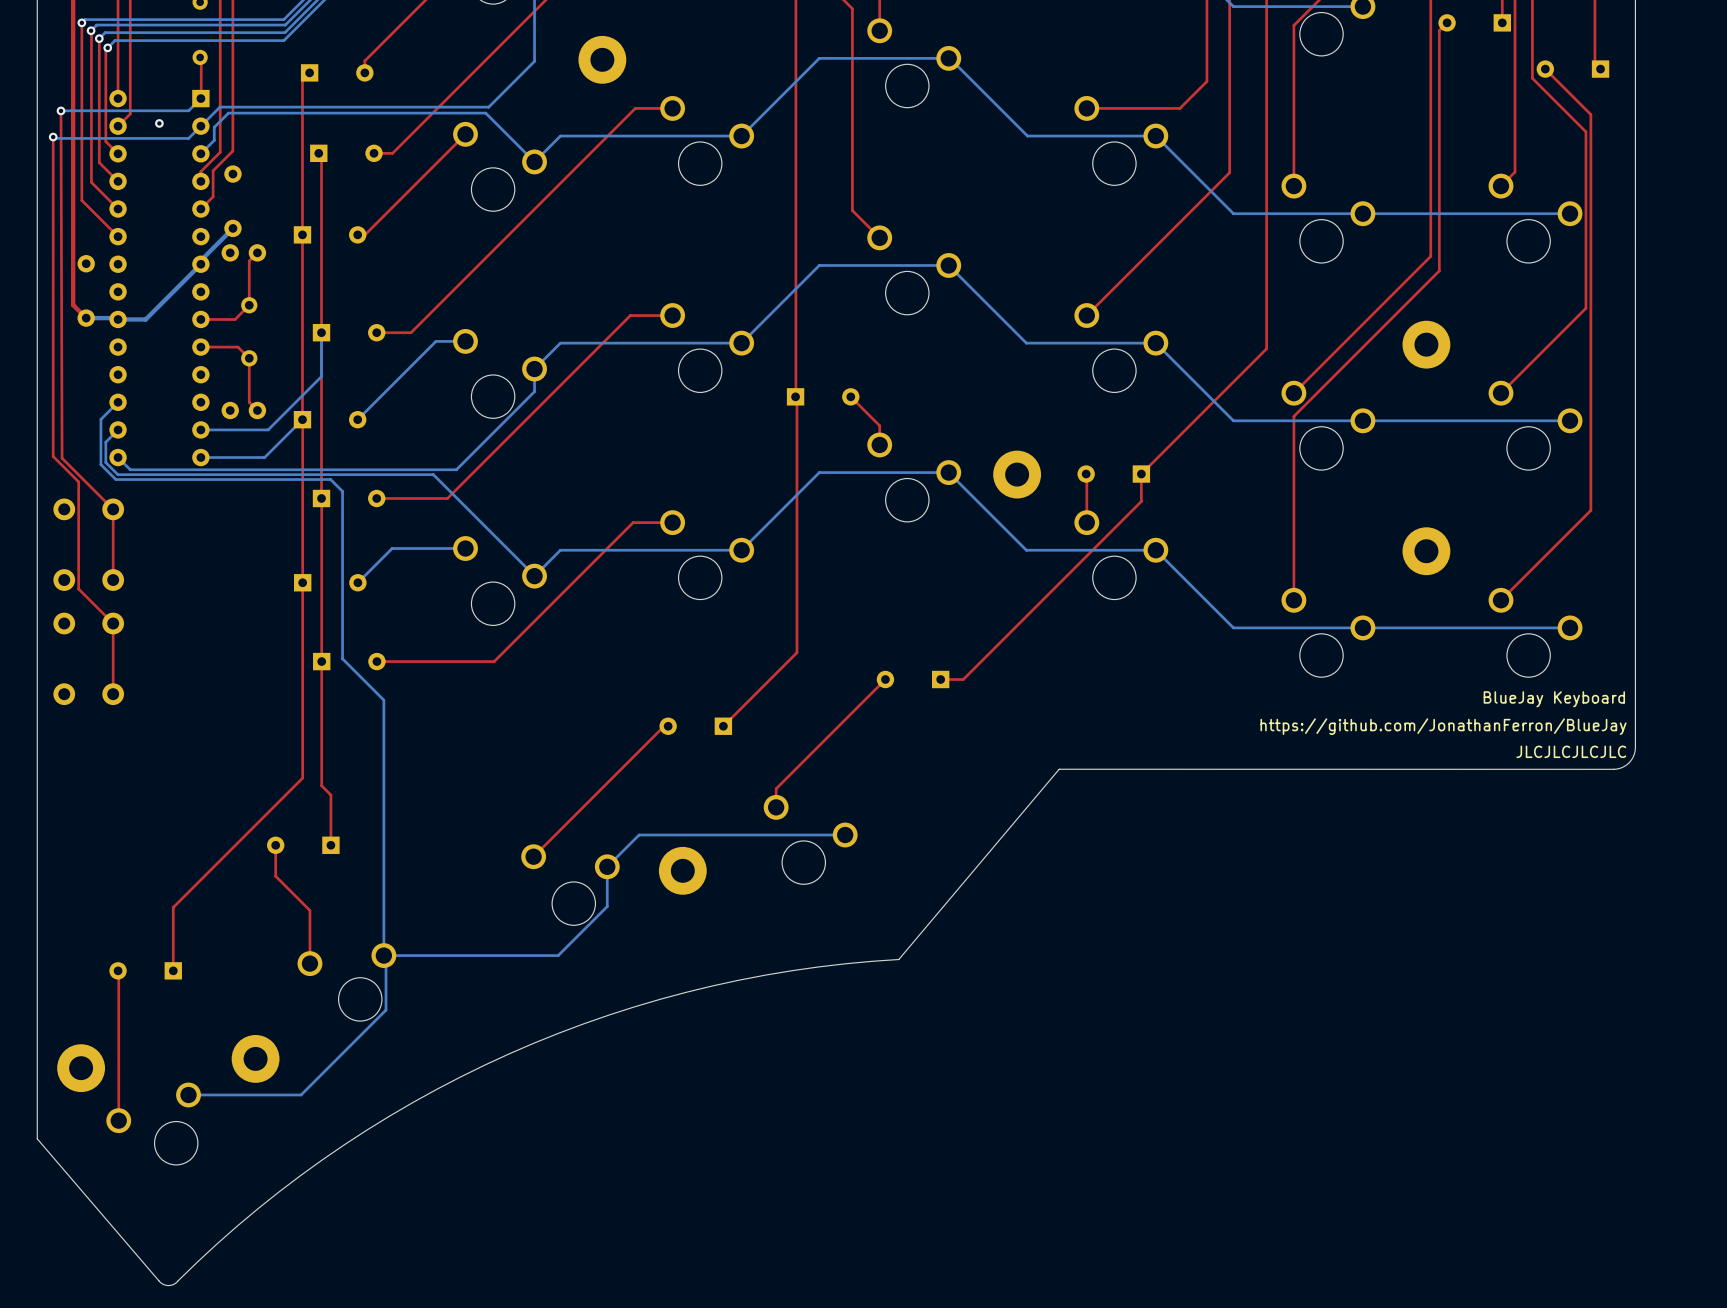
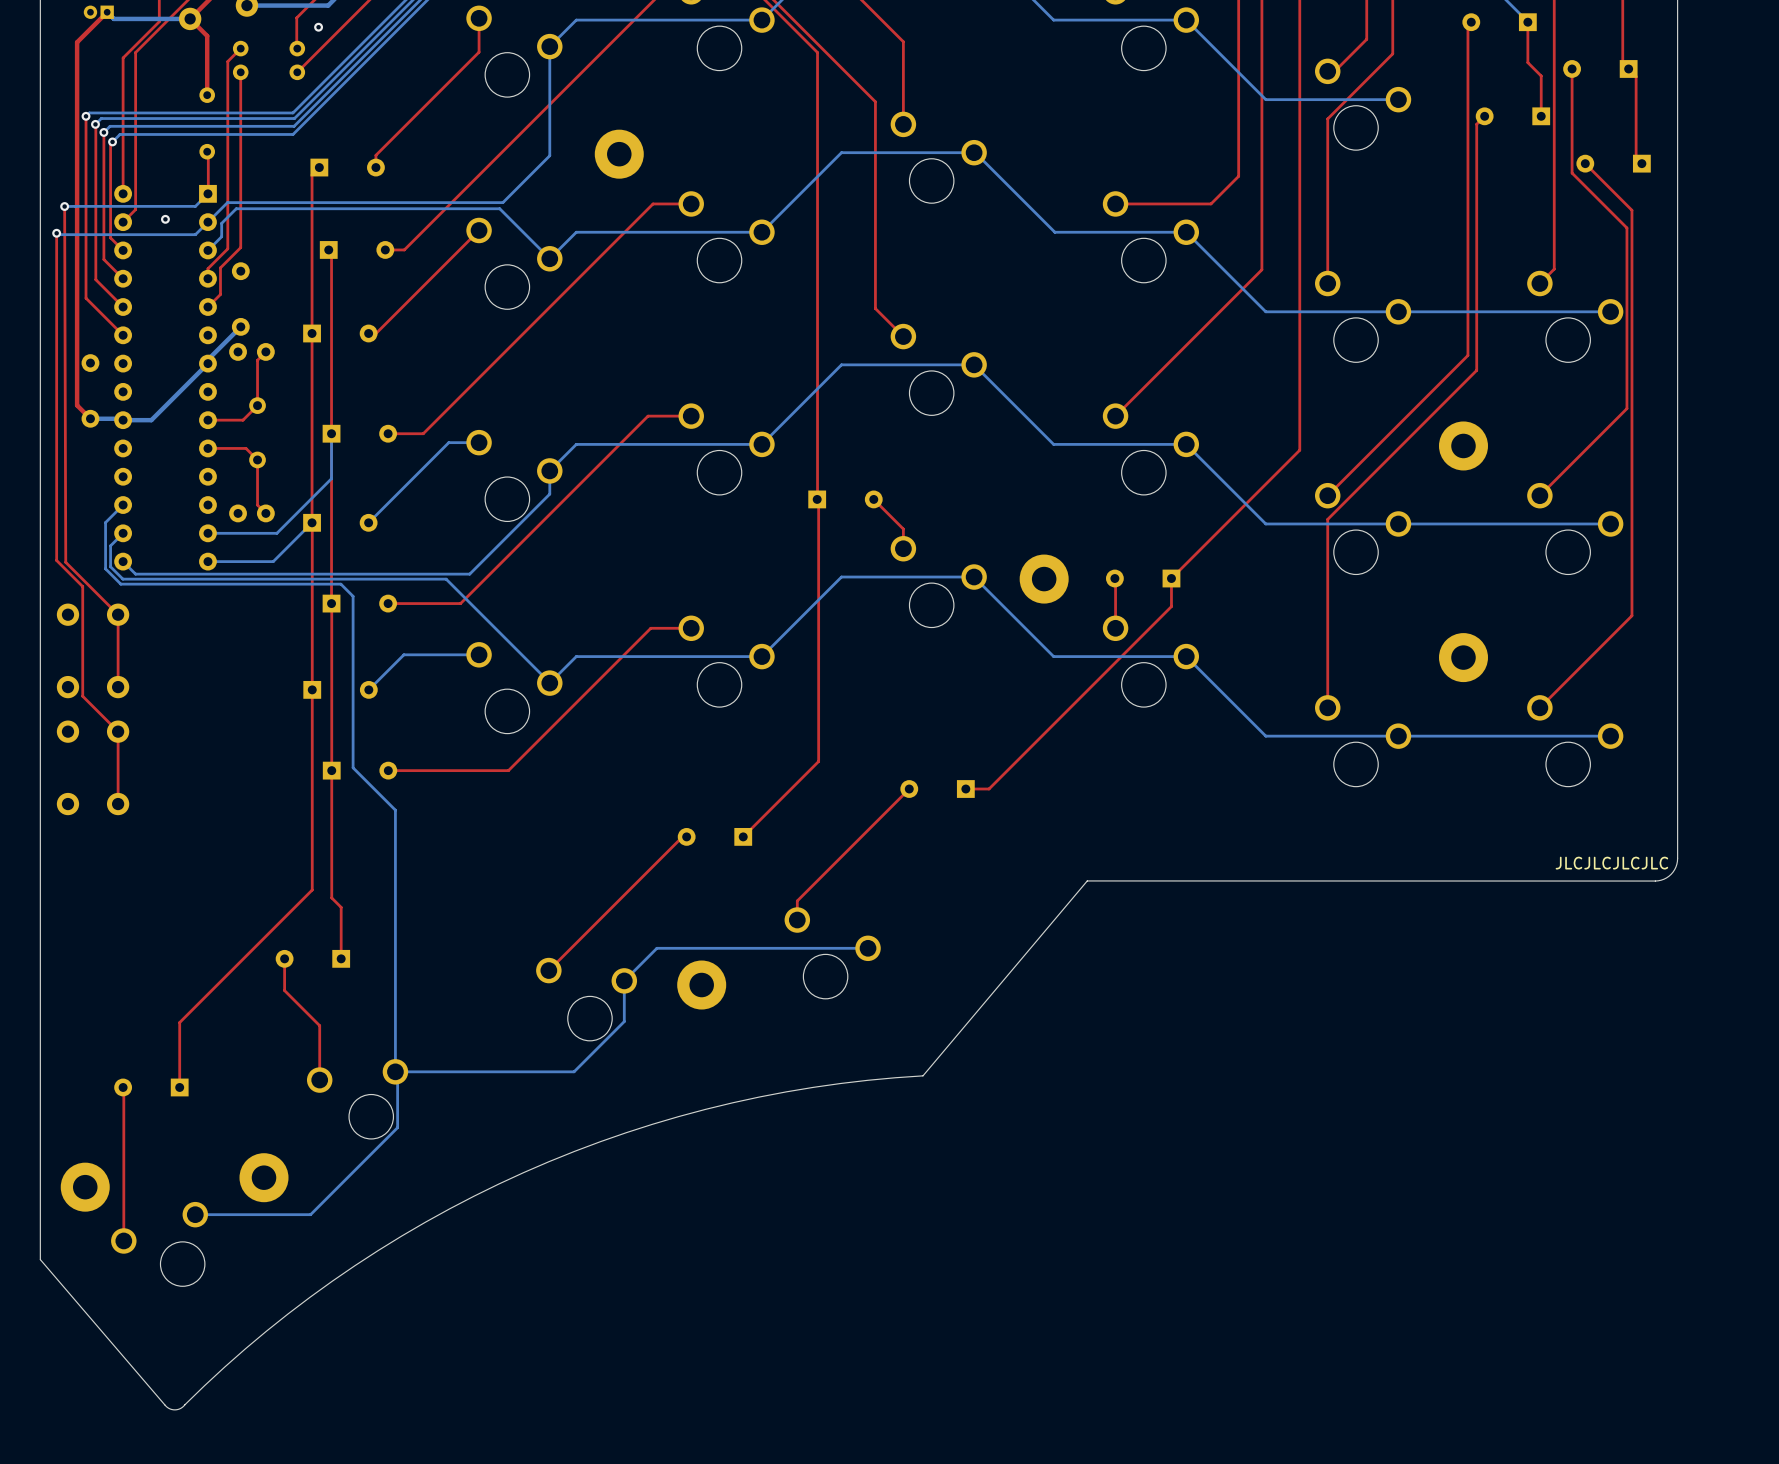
text: BlueJay Keyboard (1554, 699) -> none
text: https://github.com/JonathanFerron/BlueJay (1443, 726) -> none

